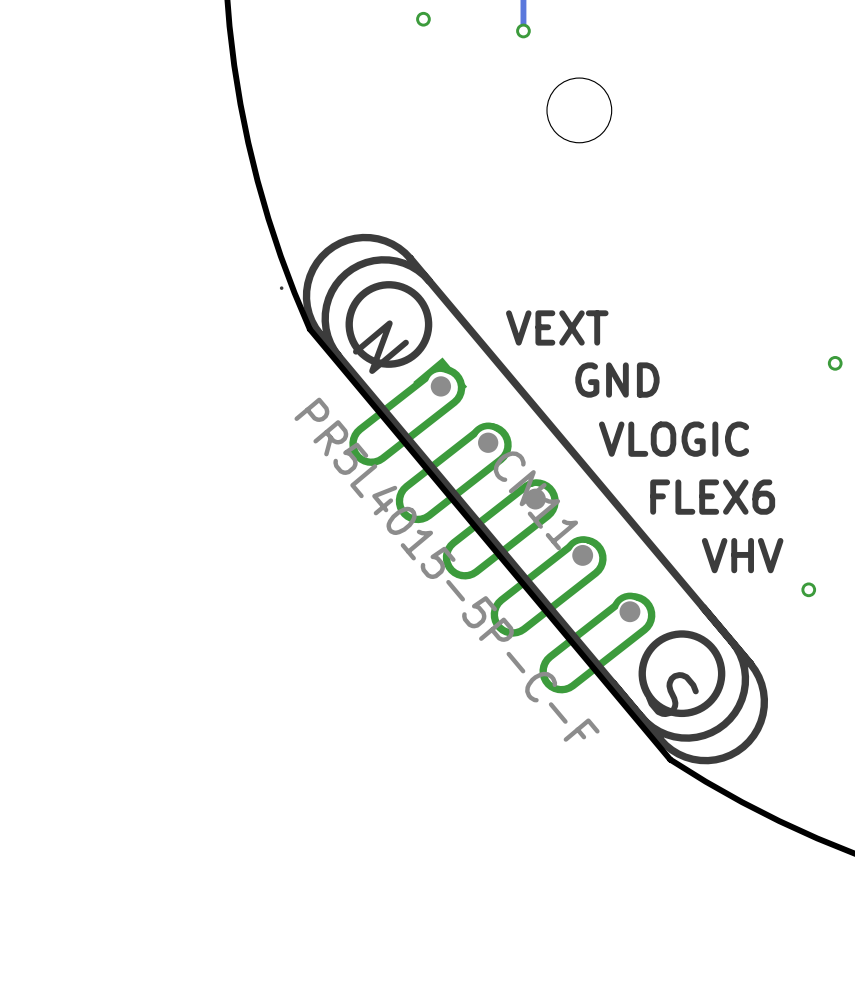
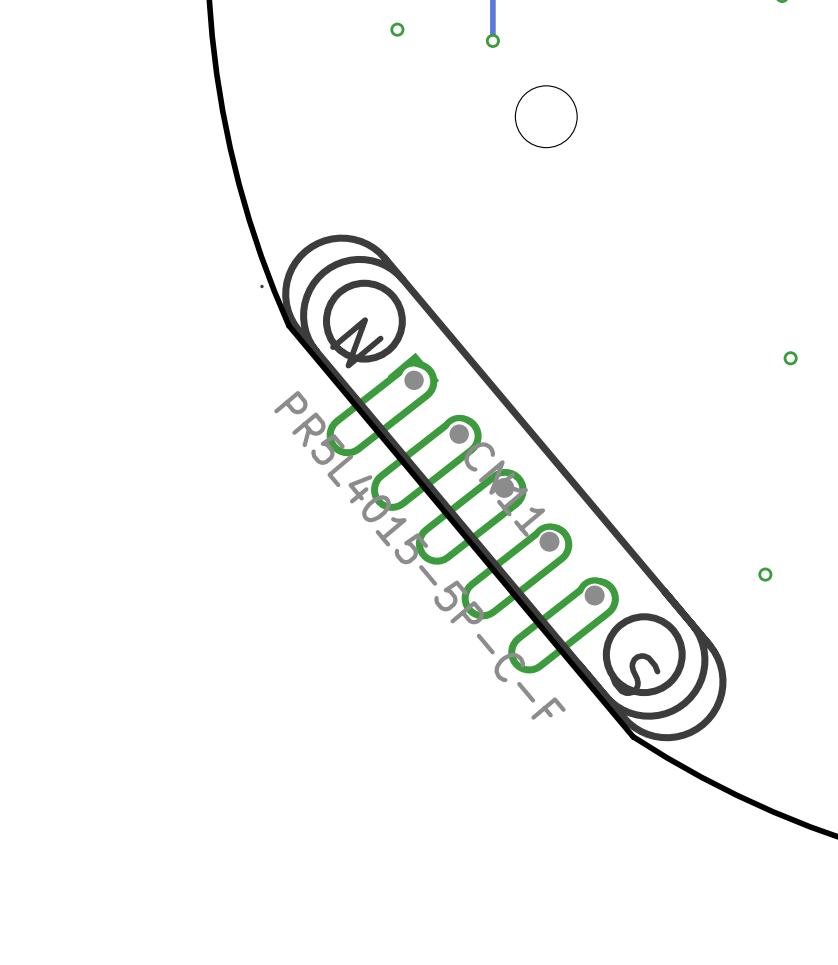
text: VEXT (557, 327) -> none
text: GND (617, 380) -> none
text: VLOGIC (674, 439) -> none
text: FLEX6 (712, 497) -> none
text: VHV (742, 555) -> none

